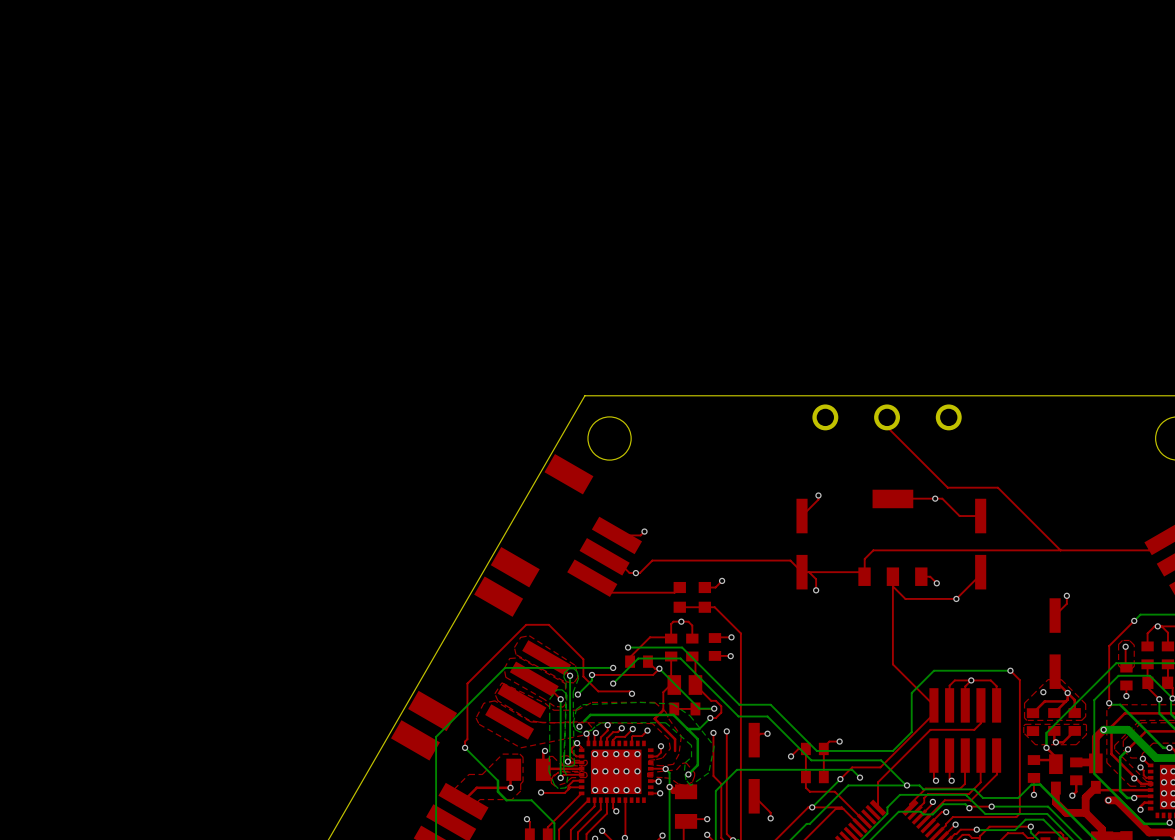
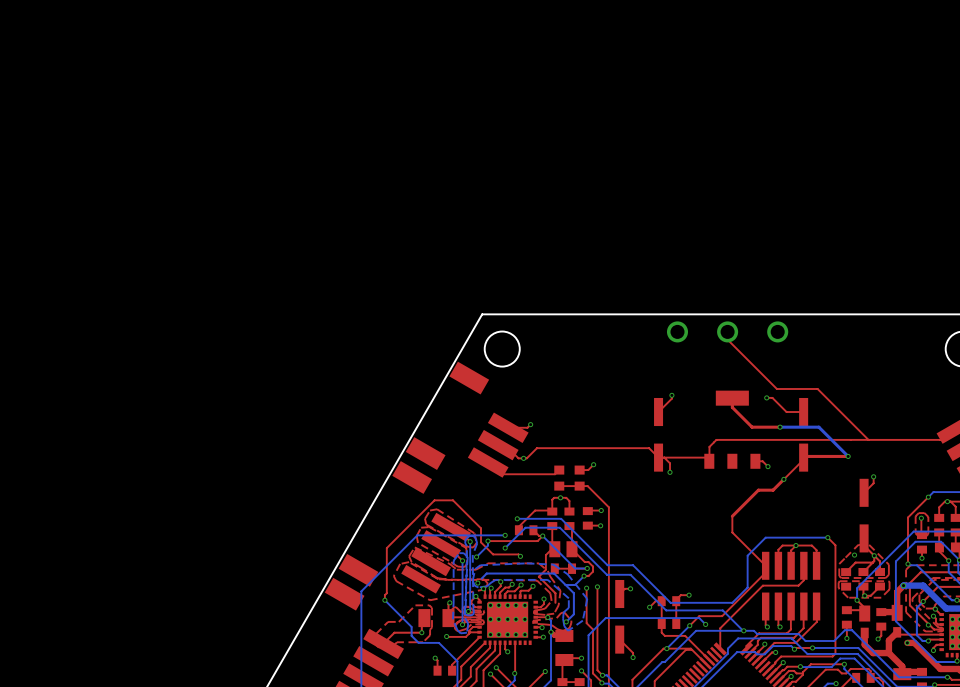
top track: (935, 498) (892, 498) -> (780, 427) (752, 427) (732, 407) (732, 398)
bottom track: none -> (780, 427) (818, 427) (848, 456)
via: none -> (780, 427)
top track: none -> (848, 456) (803, 457)
via: none -> (848, 456)
top track: (892, 576) (892, 644) -> none
top track: (892, 586) (905, 598) (956, 598) -> (732, 516) (758, 490) (773, 490) (783, 479)

